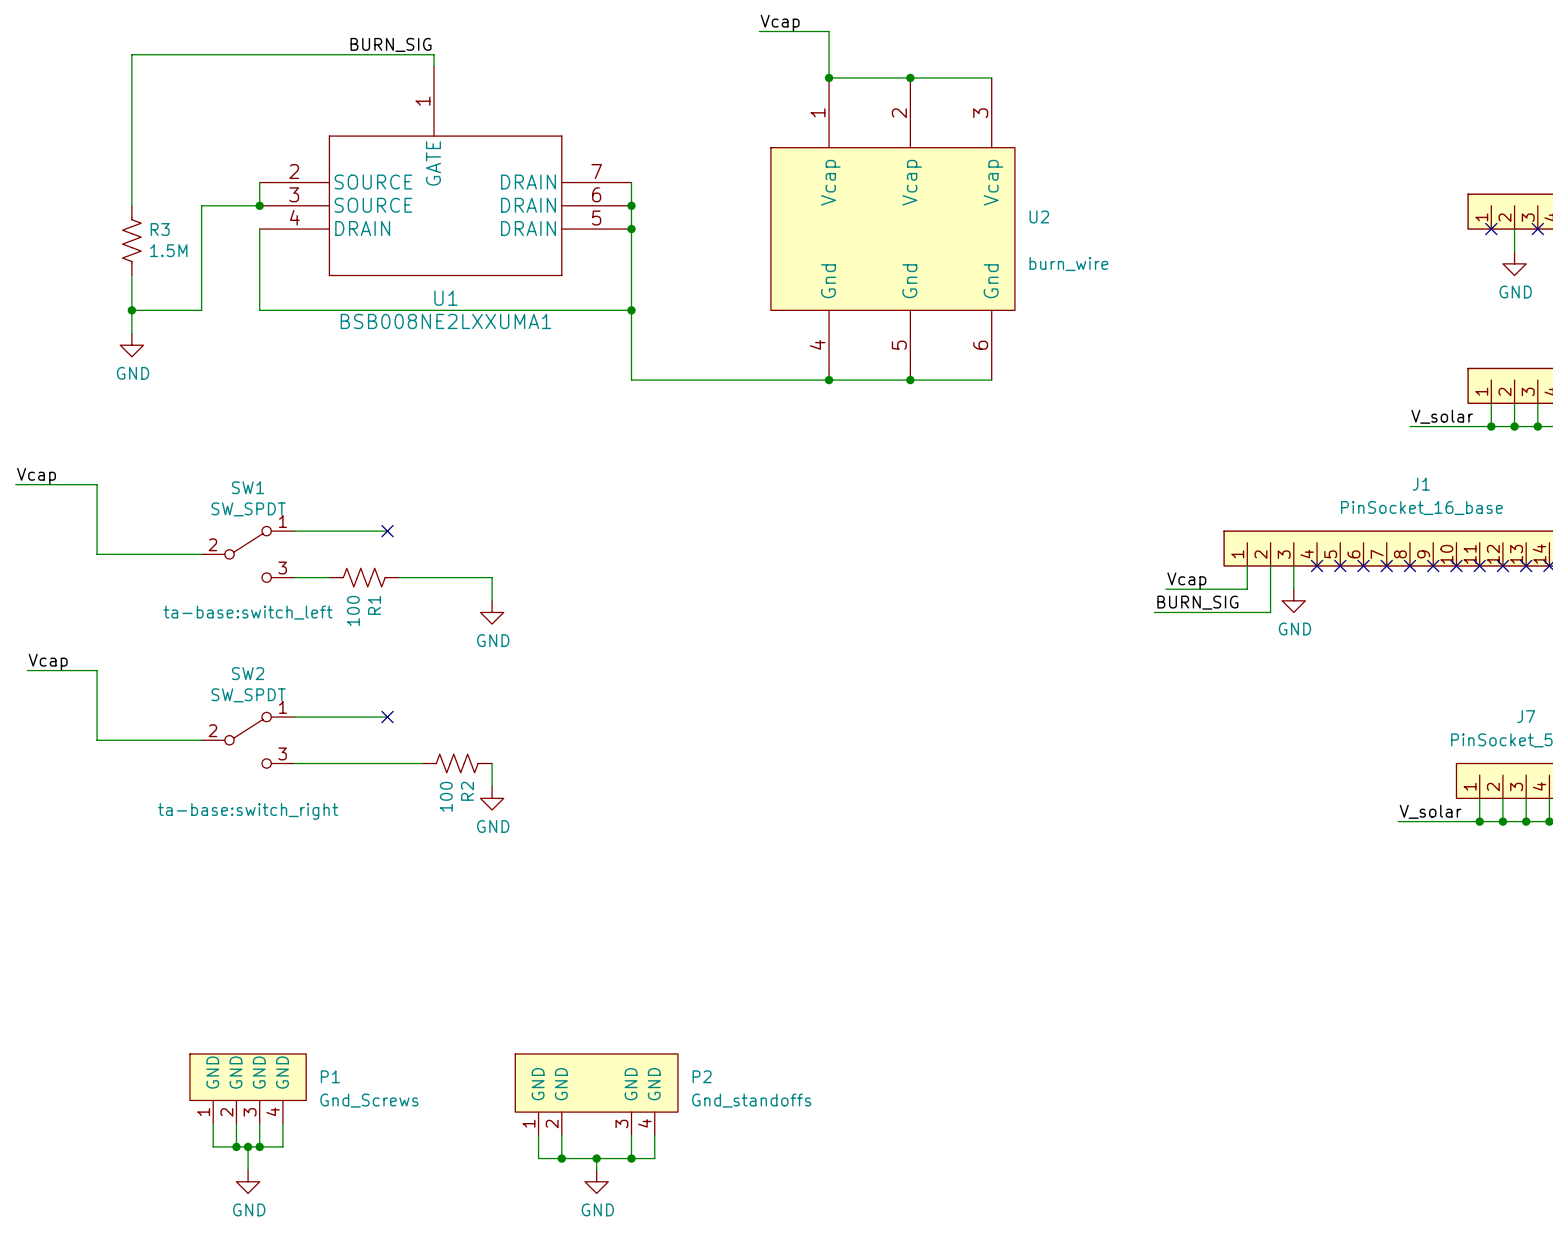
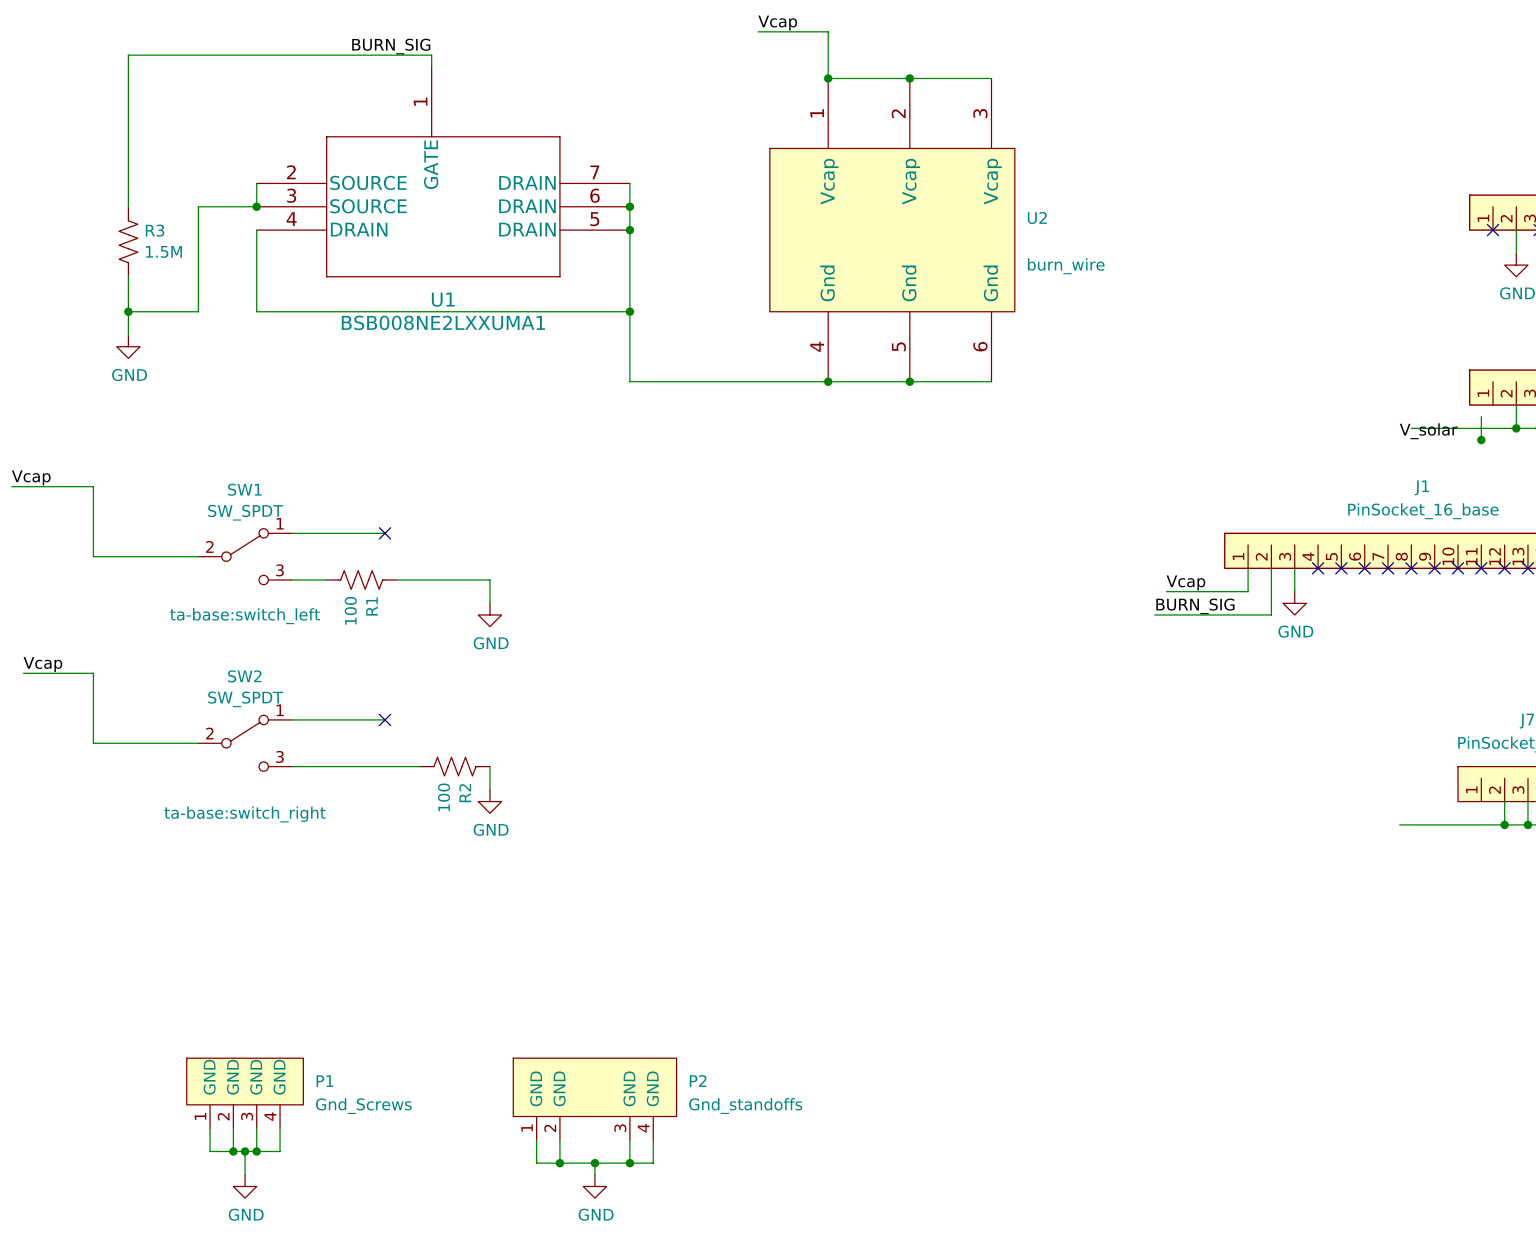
wire: (1491, 403) (1491, 426) -> (1481, 416) (1481, 440)
label position: V_solar (1442, 416) -> V_solar (1428, 431)
junction position: (1491, 426) -> (1481, 440)
wire: (1479, 798) (1479, 821) -> none
label: V_solar (1430, 811) -> none
junction: (1479, 821) -> none

